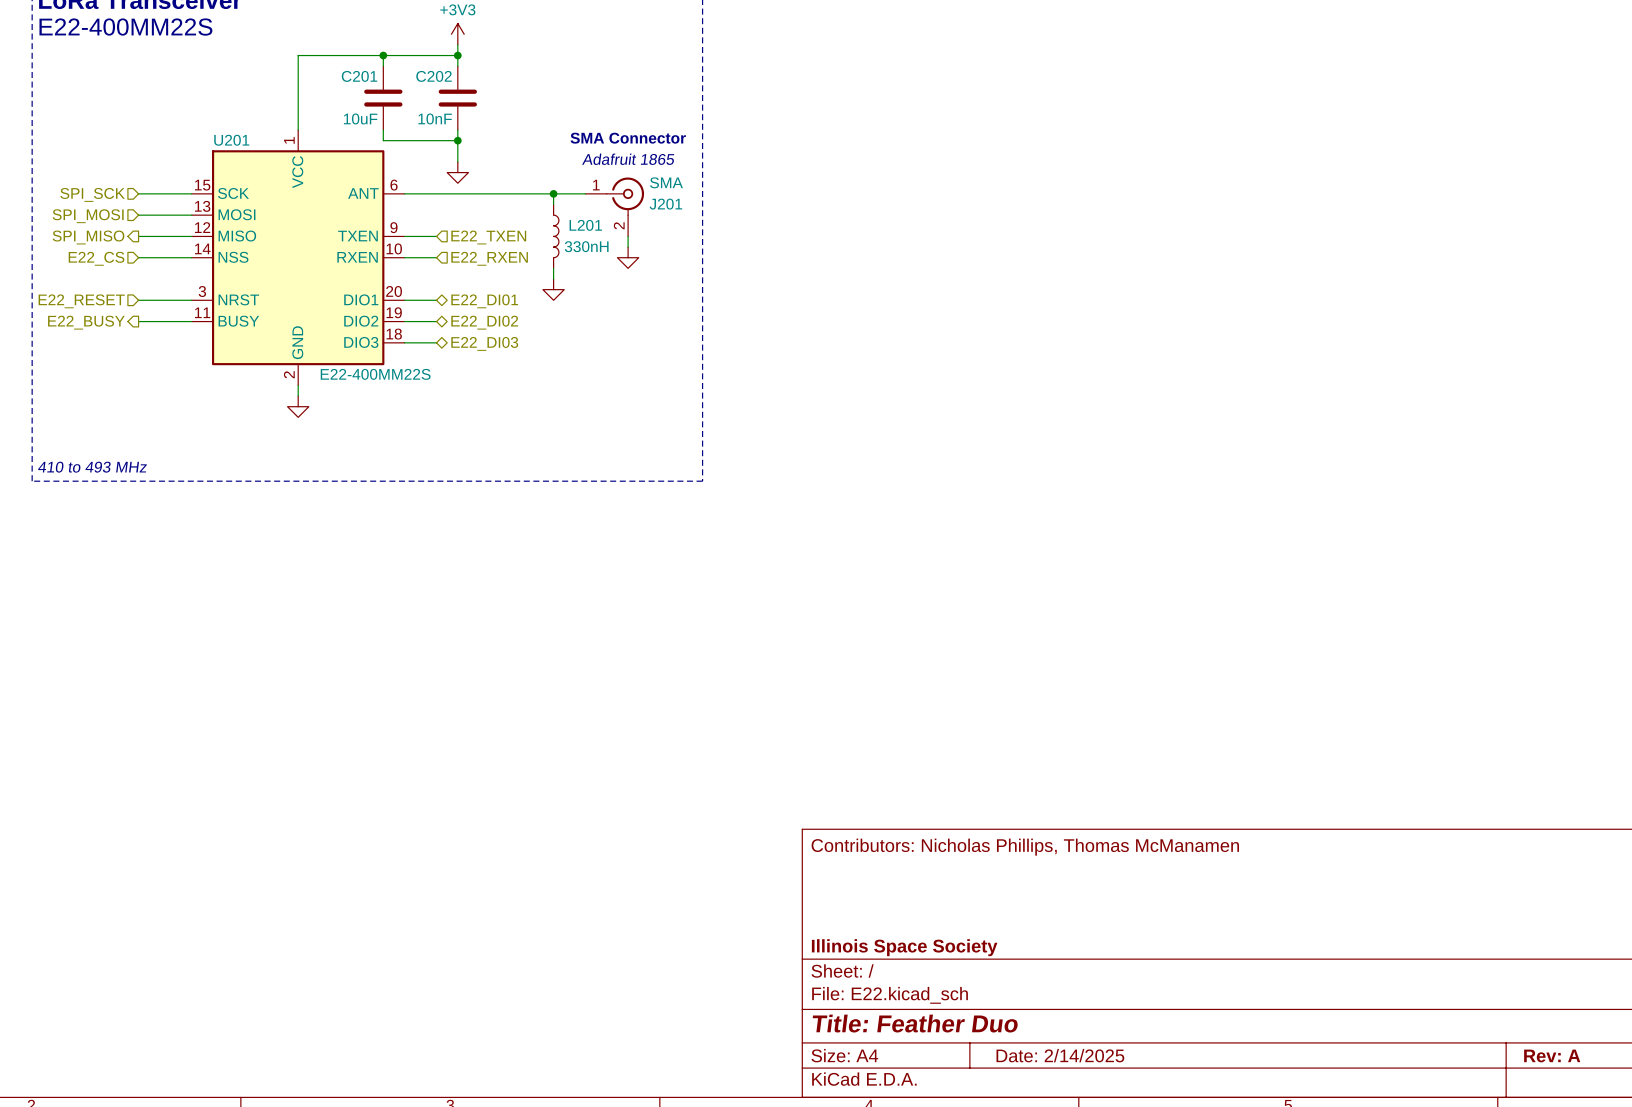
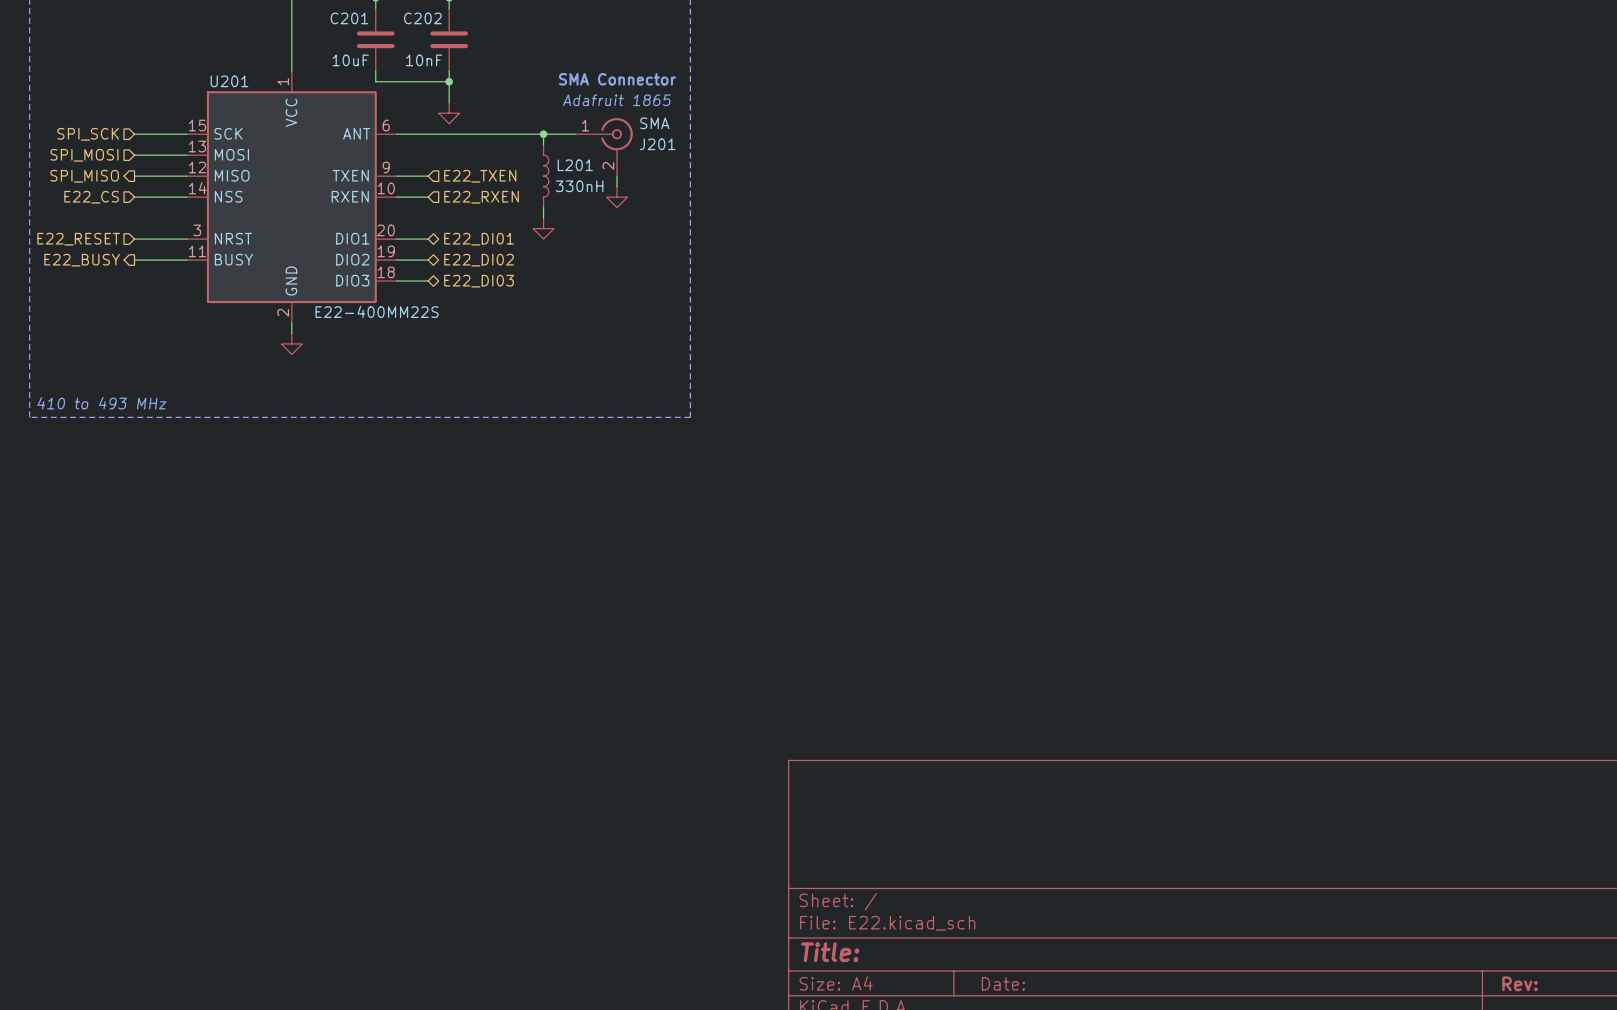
title block: Contributors: Nicholas Phillips, Thomas McManamen (1025, 847) -> none
title block: Illinois Space Society (904, 947) -> none
title block: Title: Feather Duo (915, 1023) -> Title: (830, 952)
title block: Date: 2/14/2025 (1060, 1055) -> Date: (1003, 983)
title block: Rev: A (1552, 1055) -> Rev: (1520, 983)

